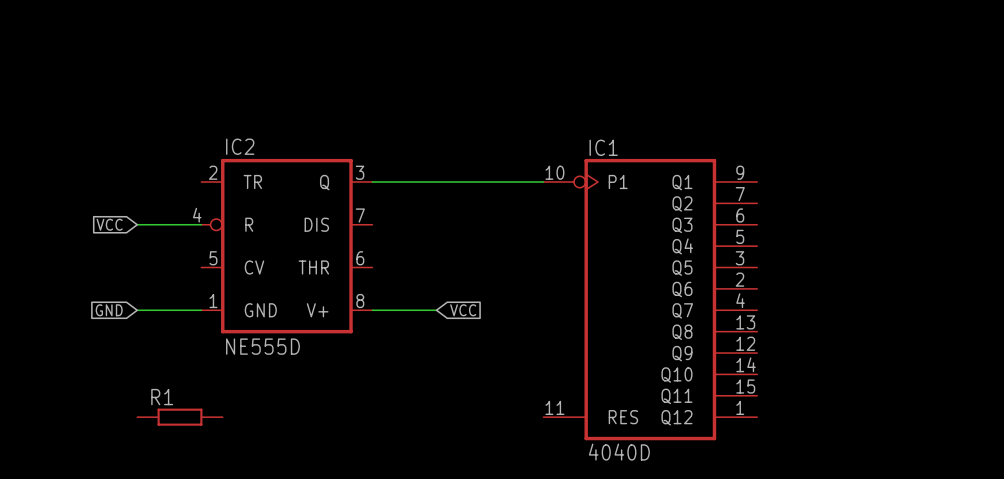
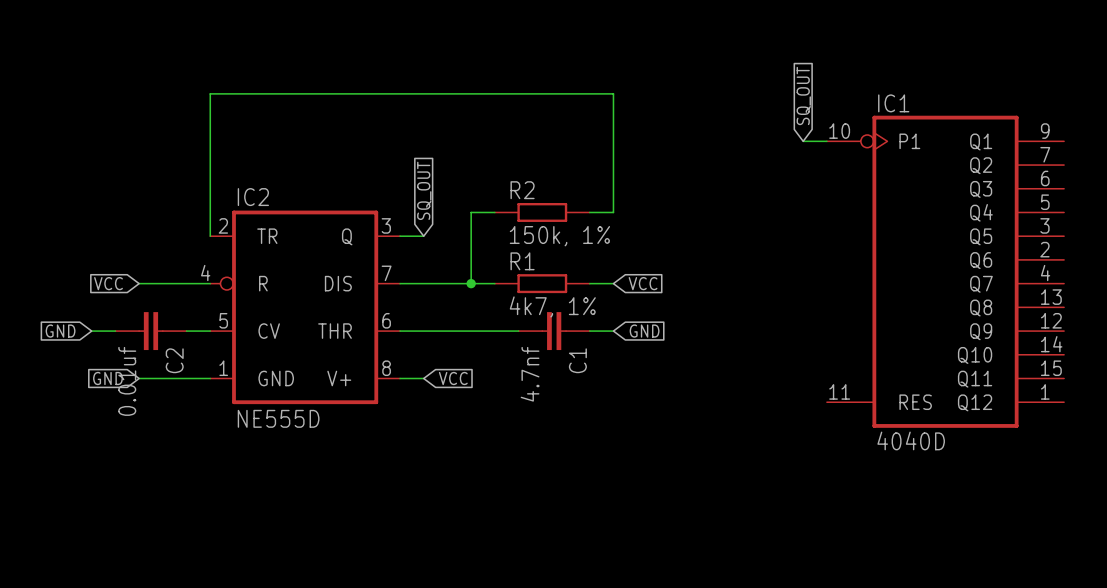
global label: none -> SQ_OUT (803, 95)
wire: none -> (803, 141) (826, 141)
global label: none -> SQ_OUT (424, 190)
wire: none -> (494, 212) (471, 212) (471, 283)
R2: none -> 150k, 1% (542, 212)
wire: none -> (589, 212) (613, 212) (613, 93) (210, 93) (210, 236)
wire: (393, 181) (543, 181) -> none
wire: none -> (400, 283) (494, 283)
junction: none -> (471, 283)
wire: none -> (589, 283) (613, 283)
global label: none -> VCC (643, 283)
R1 value: none -> 4k7, 1% (552, 306)
global label: none -> GND (60, 331)
wire: none -> (91, 331) (115, 331)
C2: none -> 0.01uf (150, 331)
wire: none -> (186, 331) (210, 331)
wire: none -> (400, 331) (518, 331)
C1: none -> 4.7nf (554, 331)
wire: none -> (589, 331) (613, 331)
global label: none -> GND (644, 331)
IC1 position: (650, 299) -> (945, 271)
wire: (393, 310) (436, 310) -> none
global label position: VCC (463, 310) -> VCC (453, 378)
R1 position: (179, 417) -> (542, 283)

